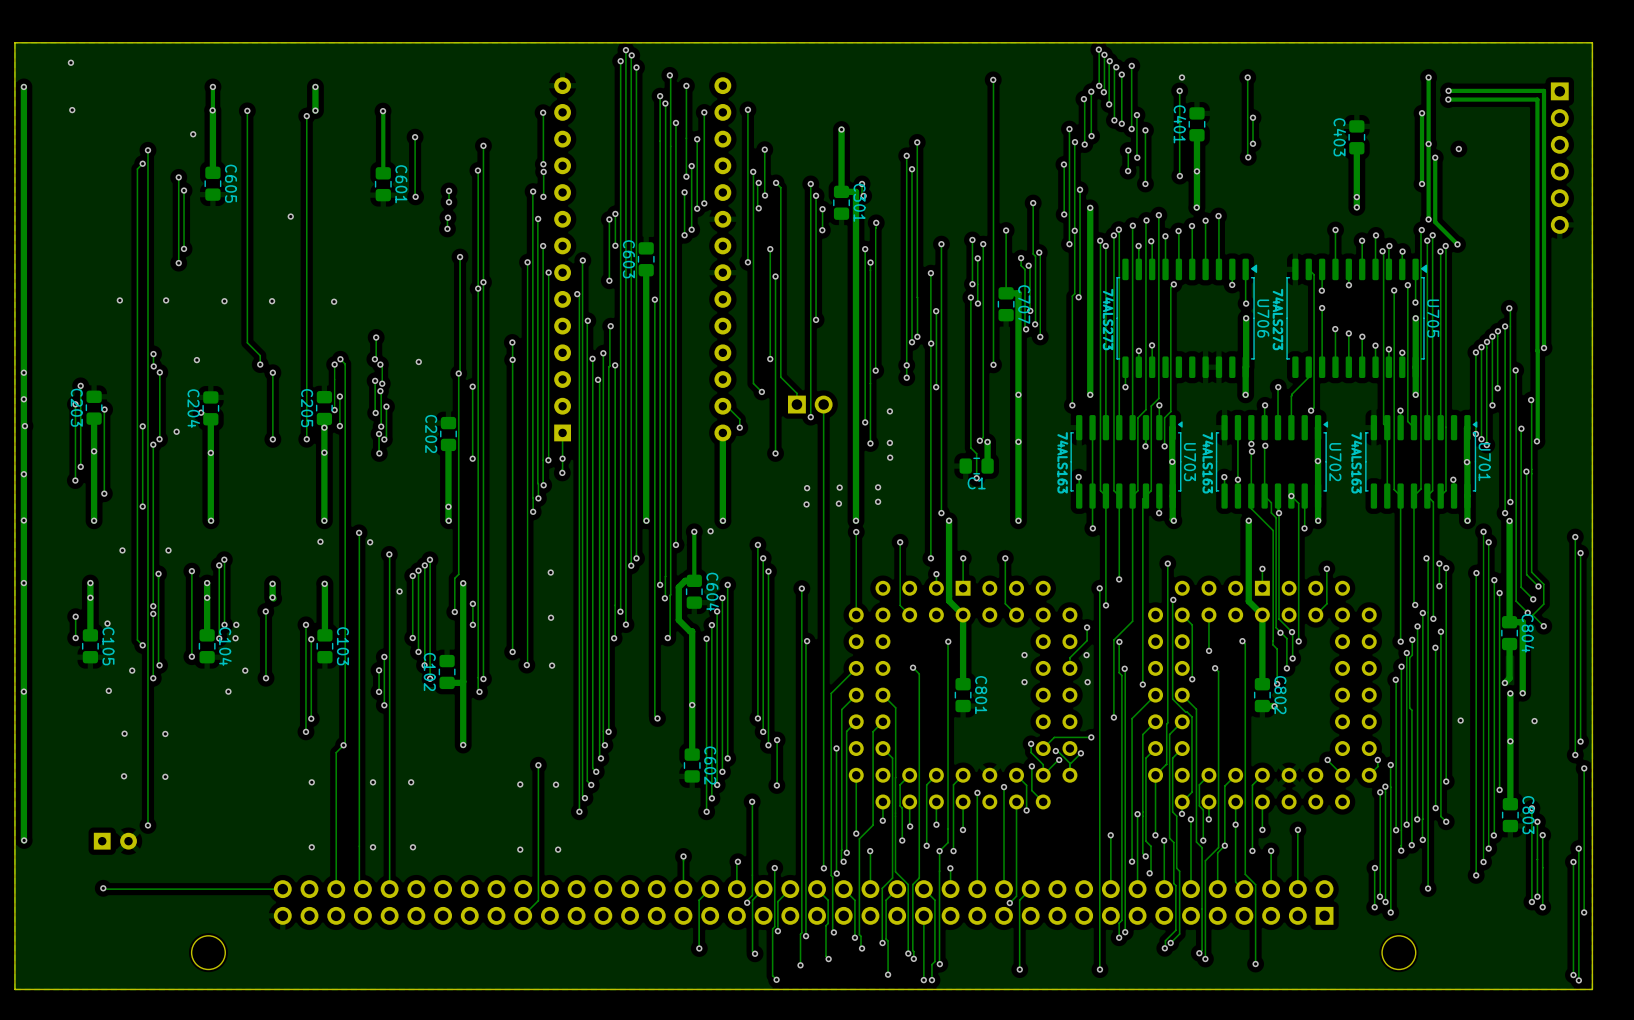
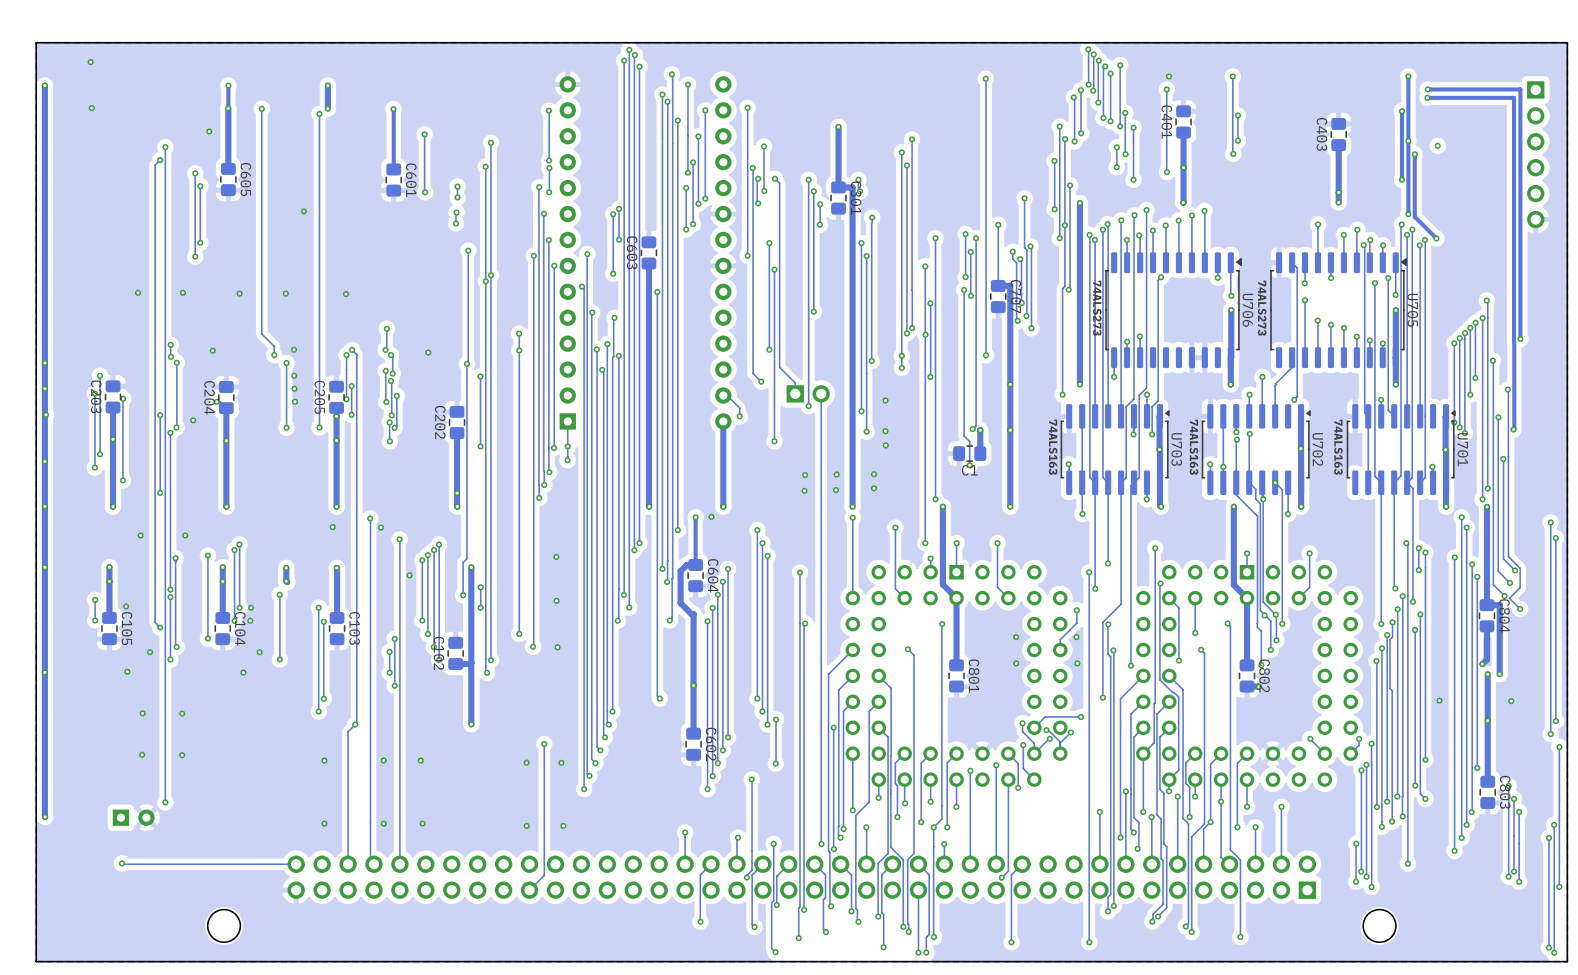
via: none -> (293, 349)
via: none -> (294, 375)
via: none -> (294, 388)
via: none -> (294, 401)

